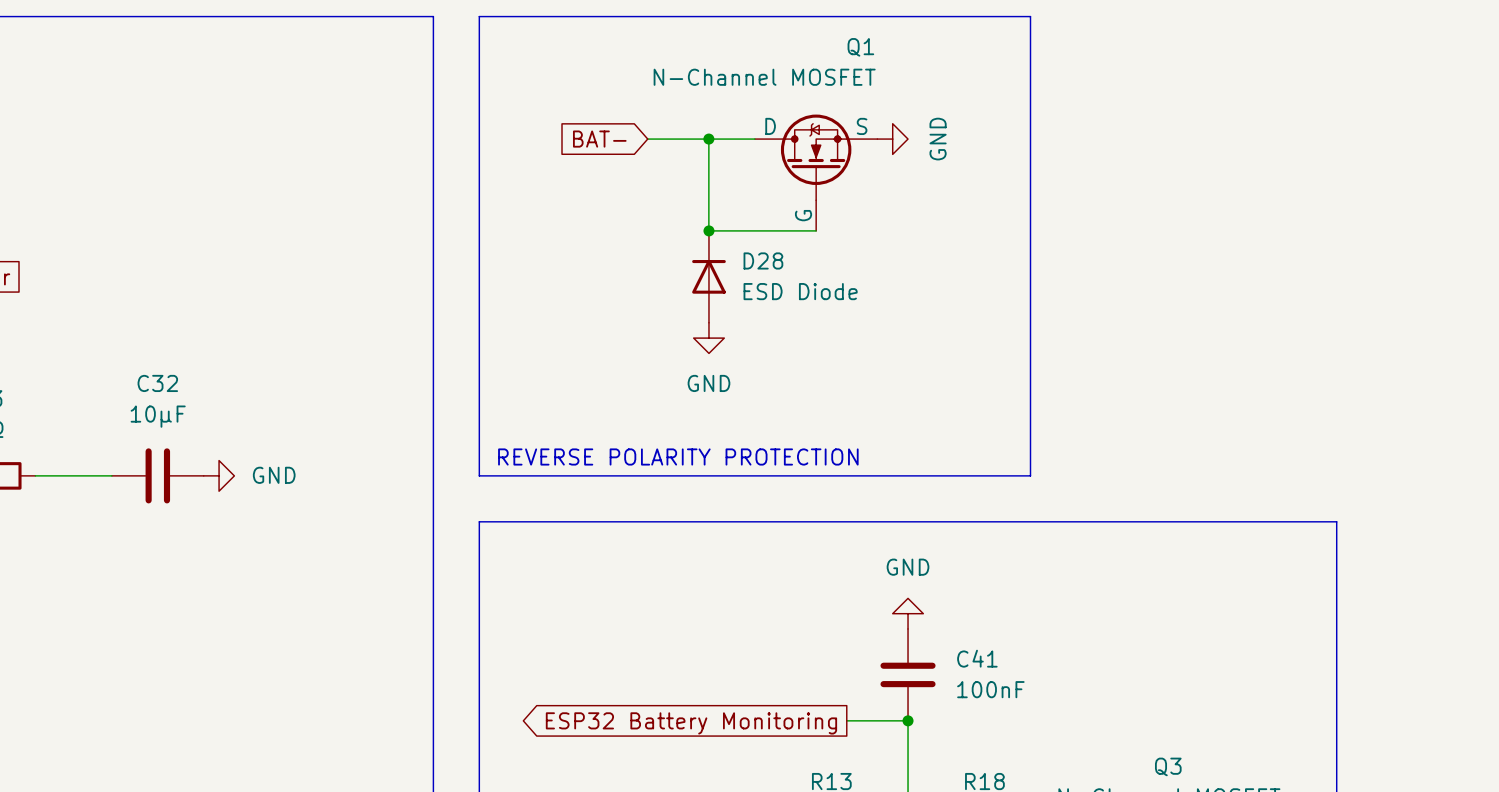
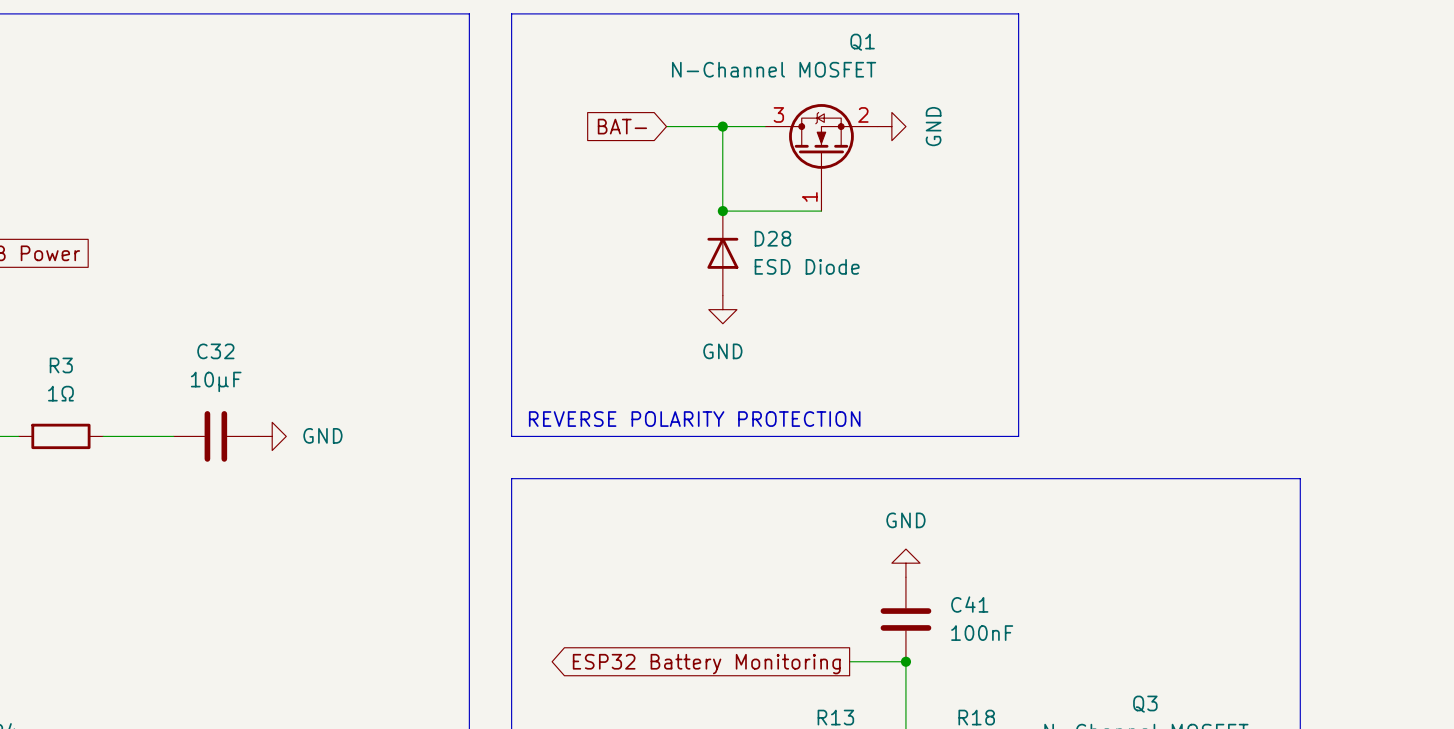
Q1 pin number: none -> 3 (778, 114)
Q1 pin name: D (770, 126) -> none
Q1 pin number: none -> 2 (863, 114)
Q1 pin name: S (862, 126) -> none
Q1 pin name: G (803, 215) -> none
Q1 pin number: none -> 1 (809, 196)

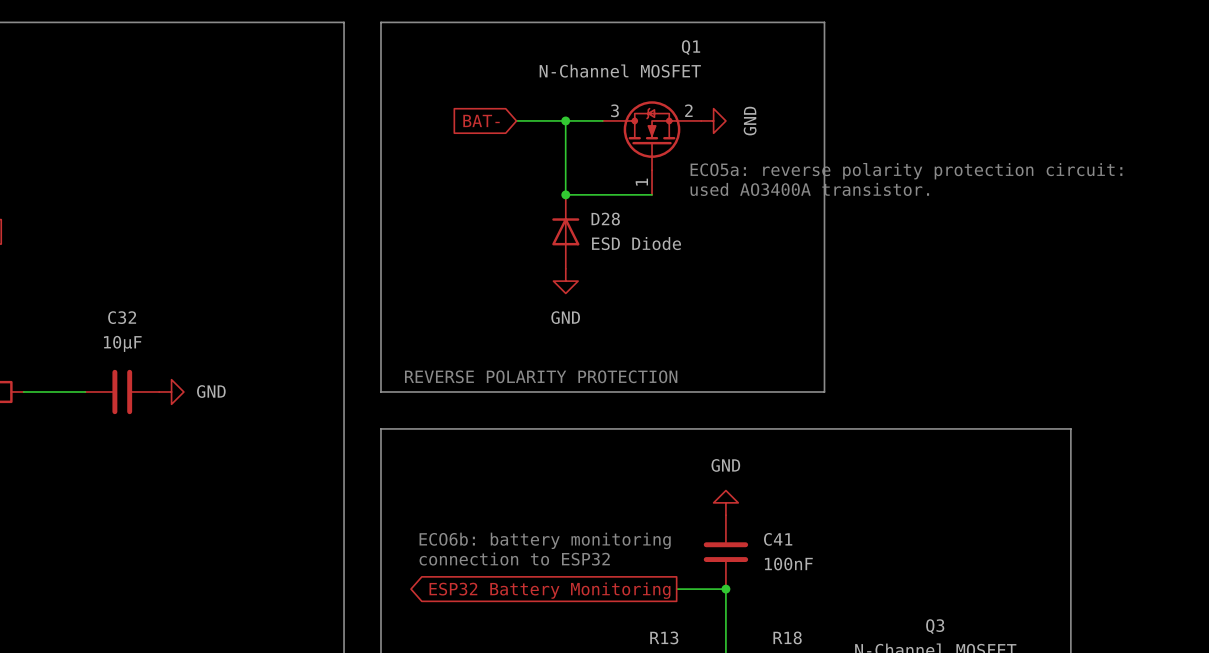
text: none -> ECO5a: reverse polarity protection circuit: (906, 171)
text: none -> used AO3400A transistor. (809, 189)
text: none -> ECO6b: battery monitoring (545, 540)
text: none -> connection to ESP32 (514, 559)

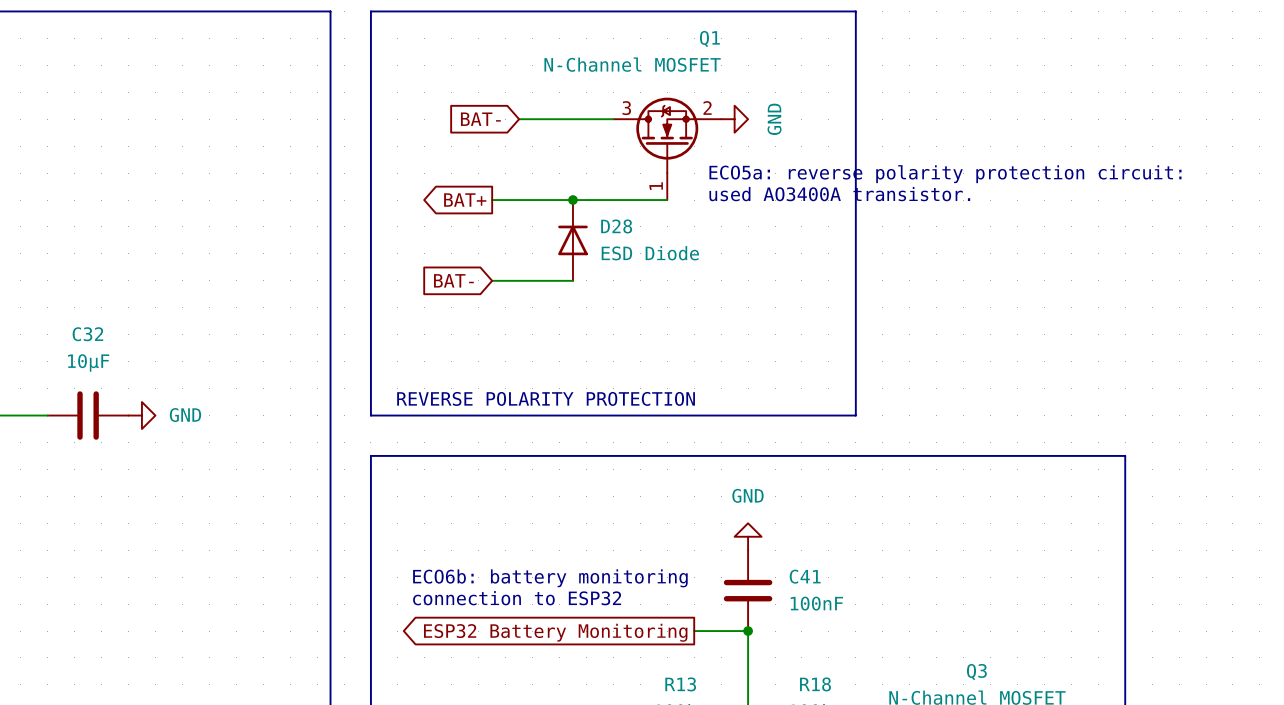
wire: (565, 120) (565, 194) -> (492, 200) (572, 200)
junction: (565, 120) -> none
global label: none -> BAT+ (465, 200)
global label: none -> BAT- (453, 280)
wire: none -> (492, 280) (572, 280)
power symbol: GND (565, 281) -> none

